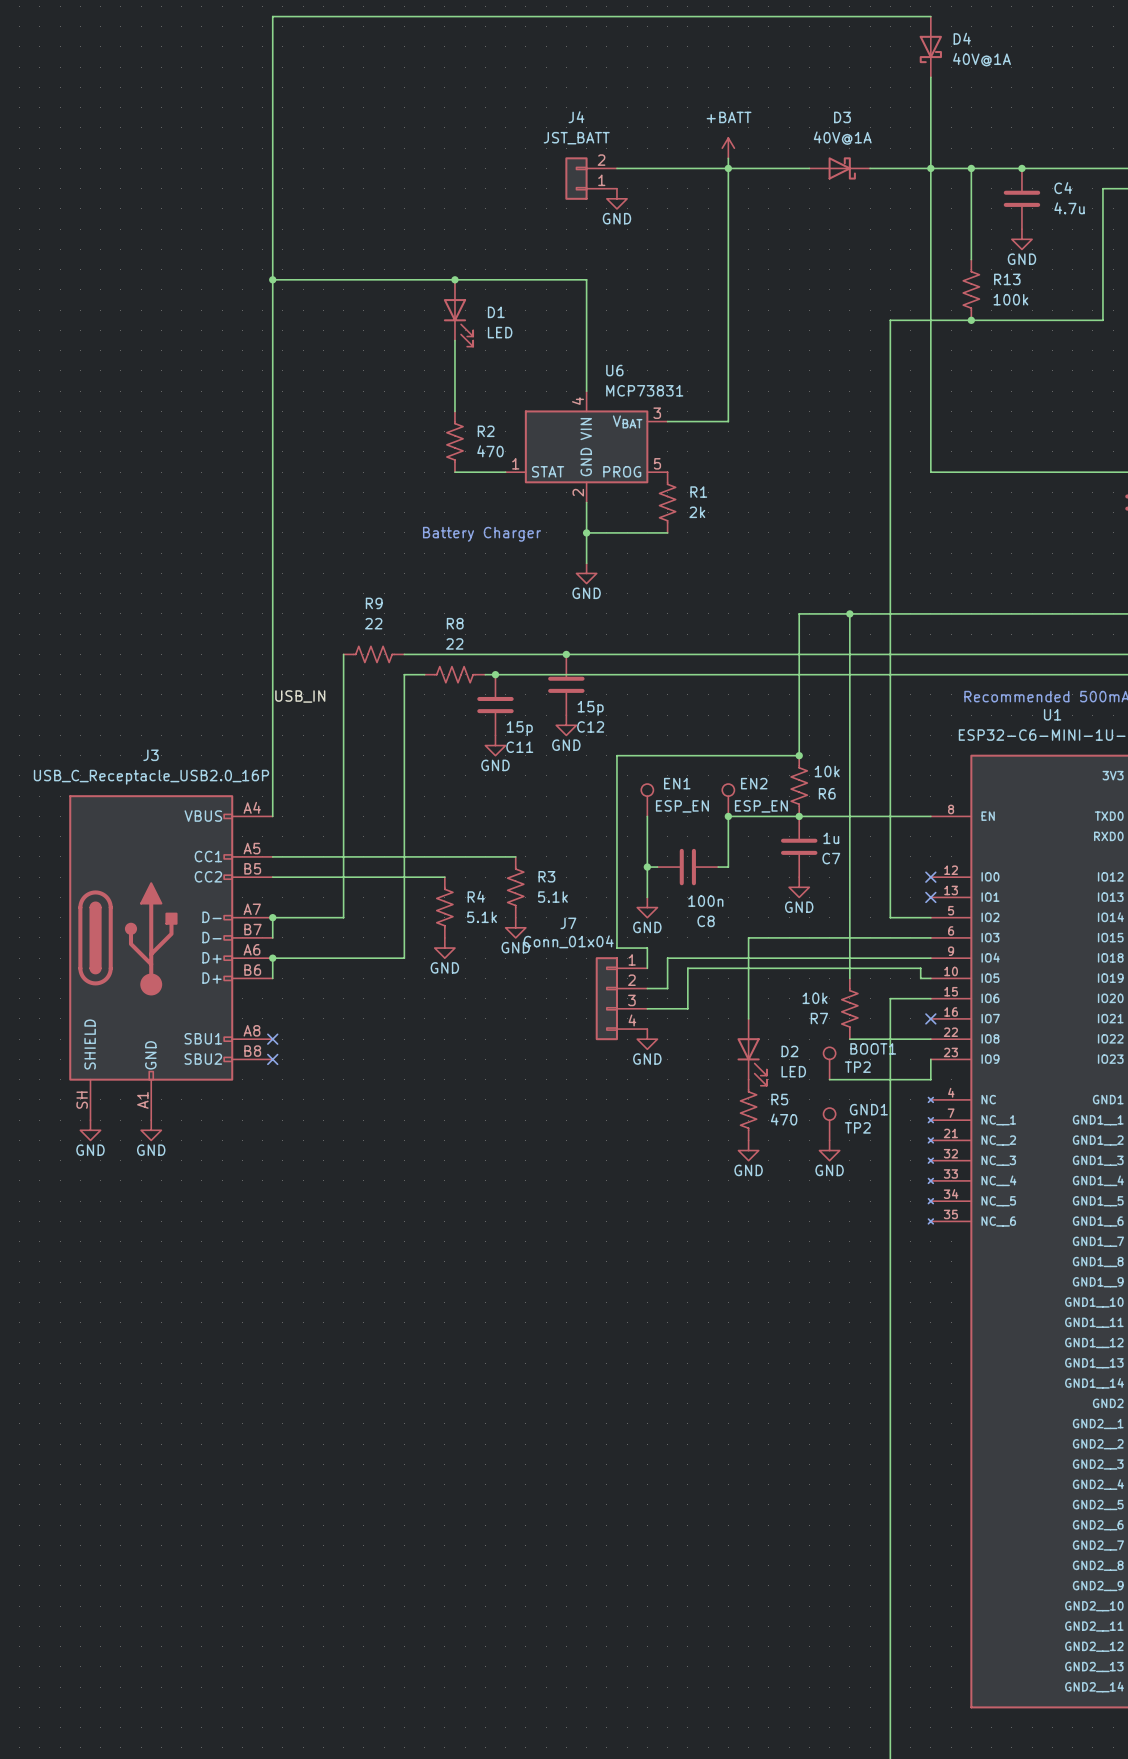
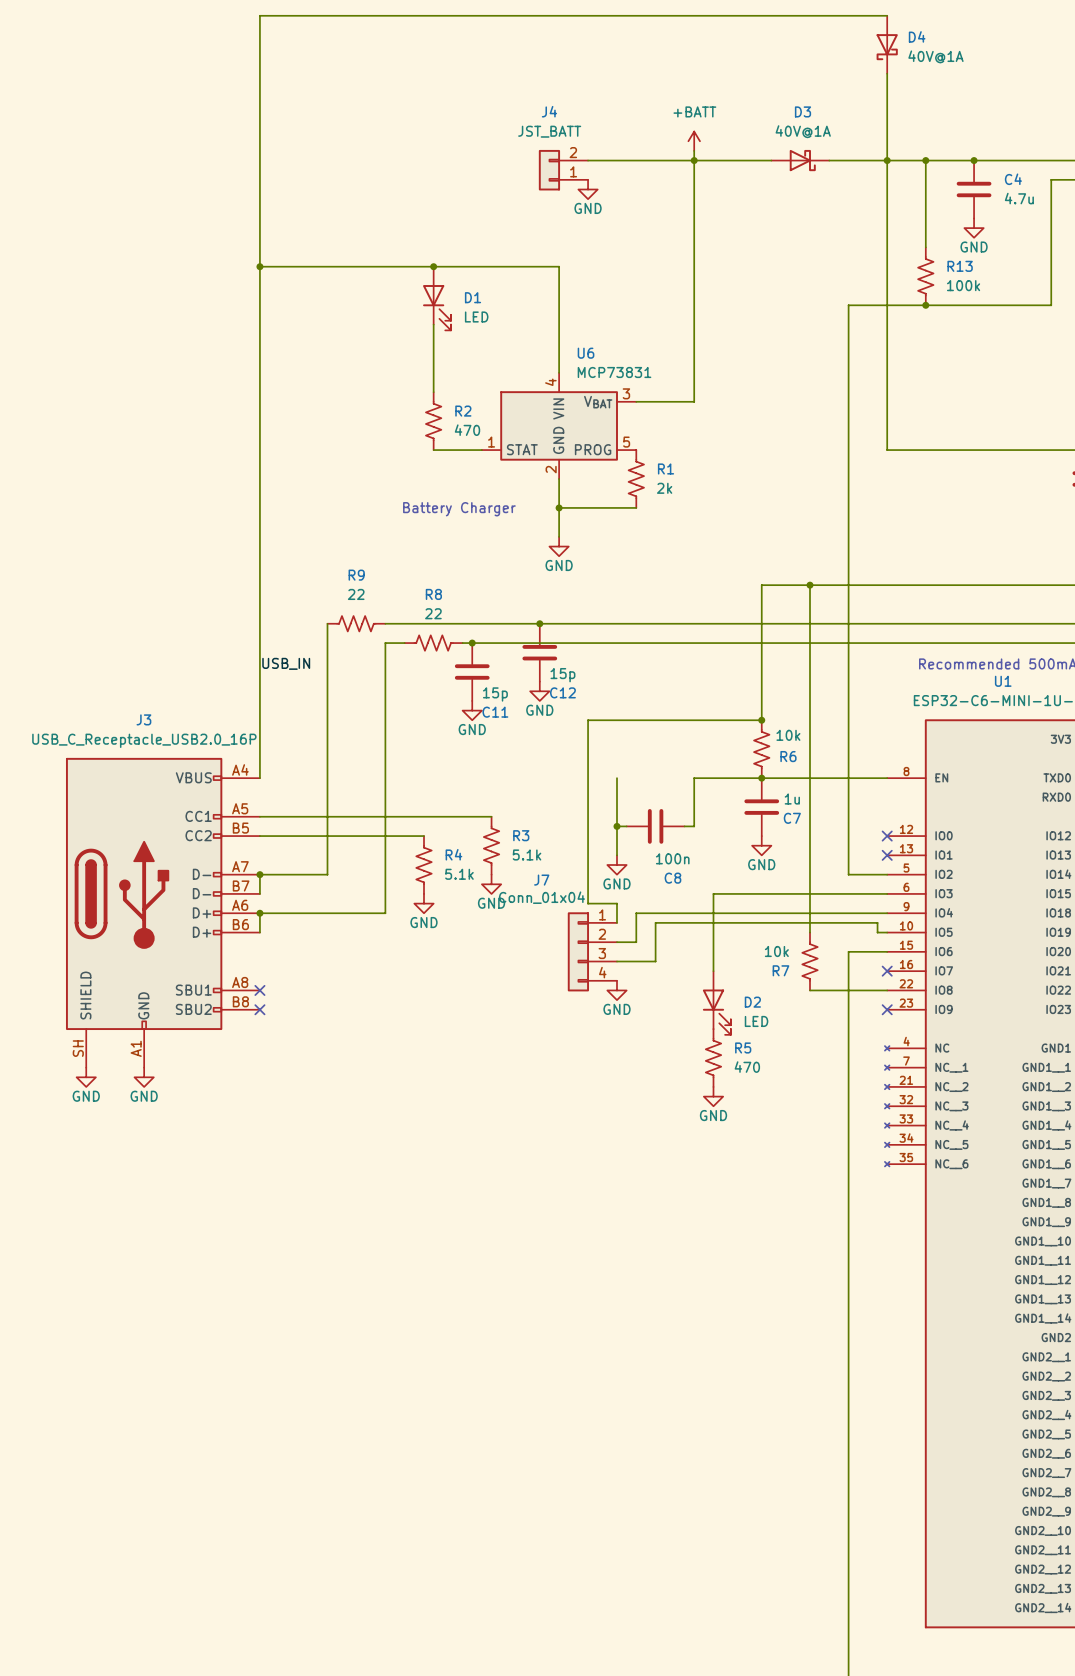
EN1: ESP_EN (647, 800) -> none
EN2: ESP_EN (728, 800) -> none
junction: (728, 816) -> none
wire: (930, 1059) (930, 1079) (829, 1079) -> none
no-connect mark: none -> (887, 1009)
BOOT1: TP2 (829, 1063) -> none
GND1: TP2 (829, 1124) -> none
power symbol: GND (829, 1150) -> none

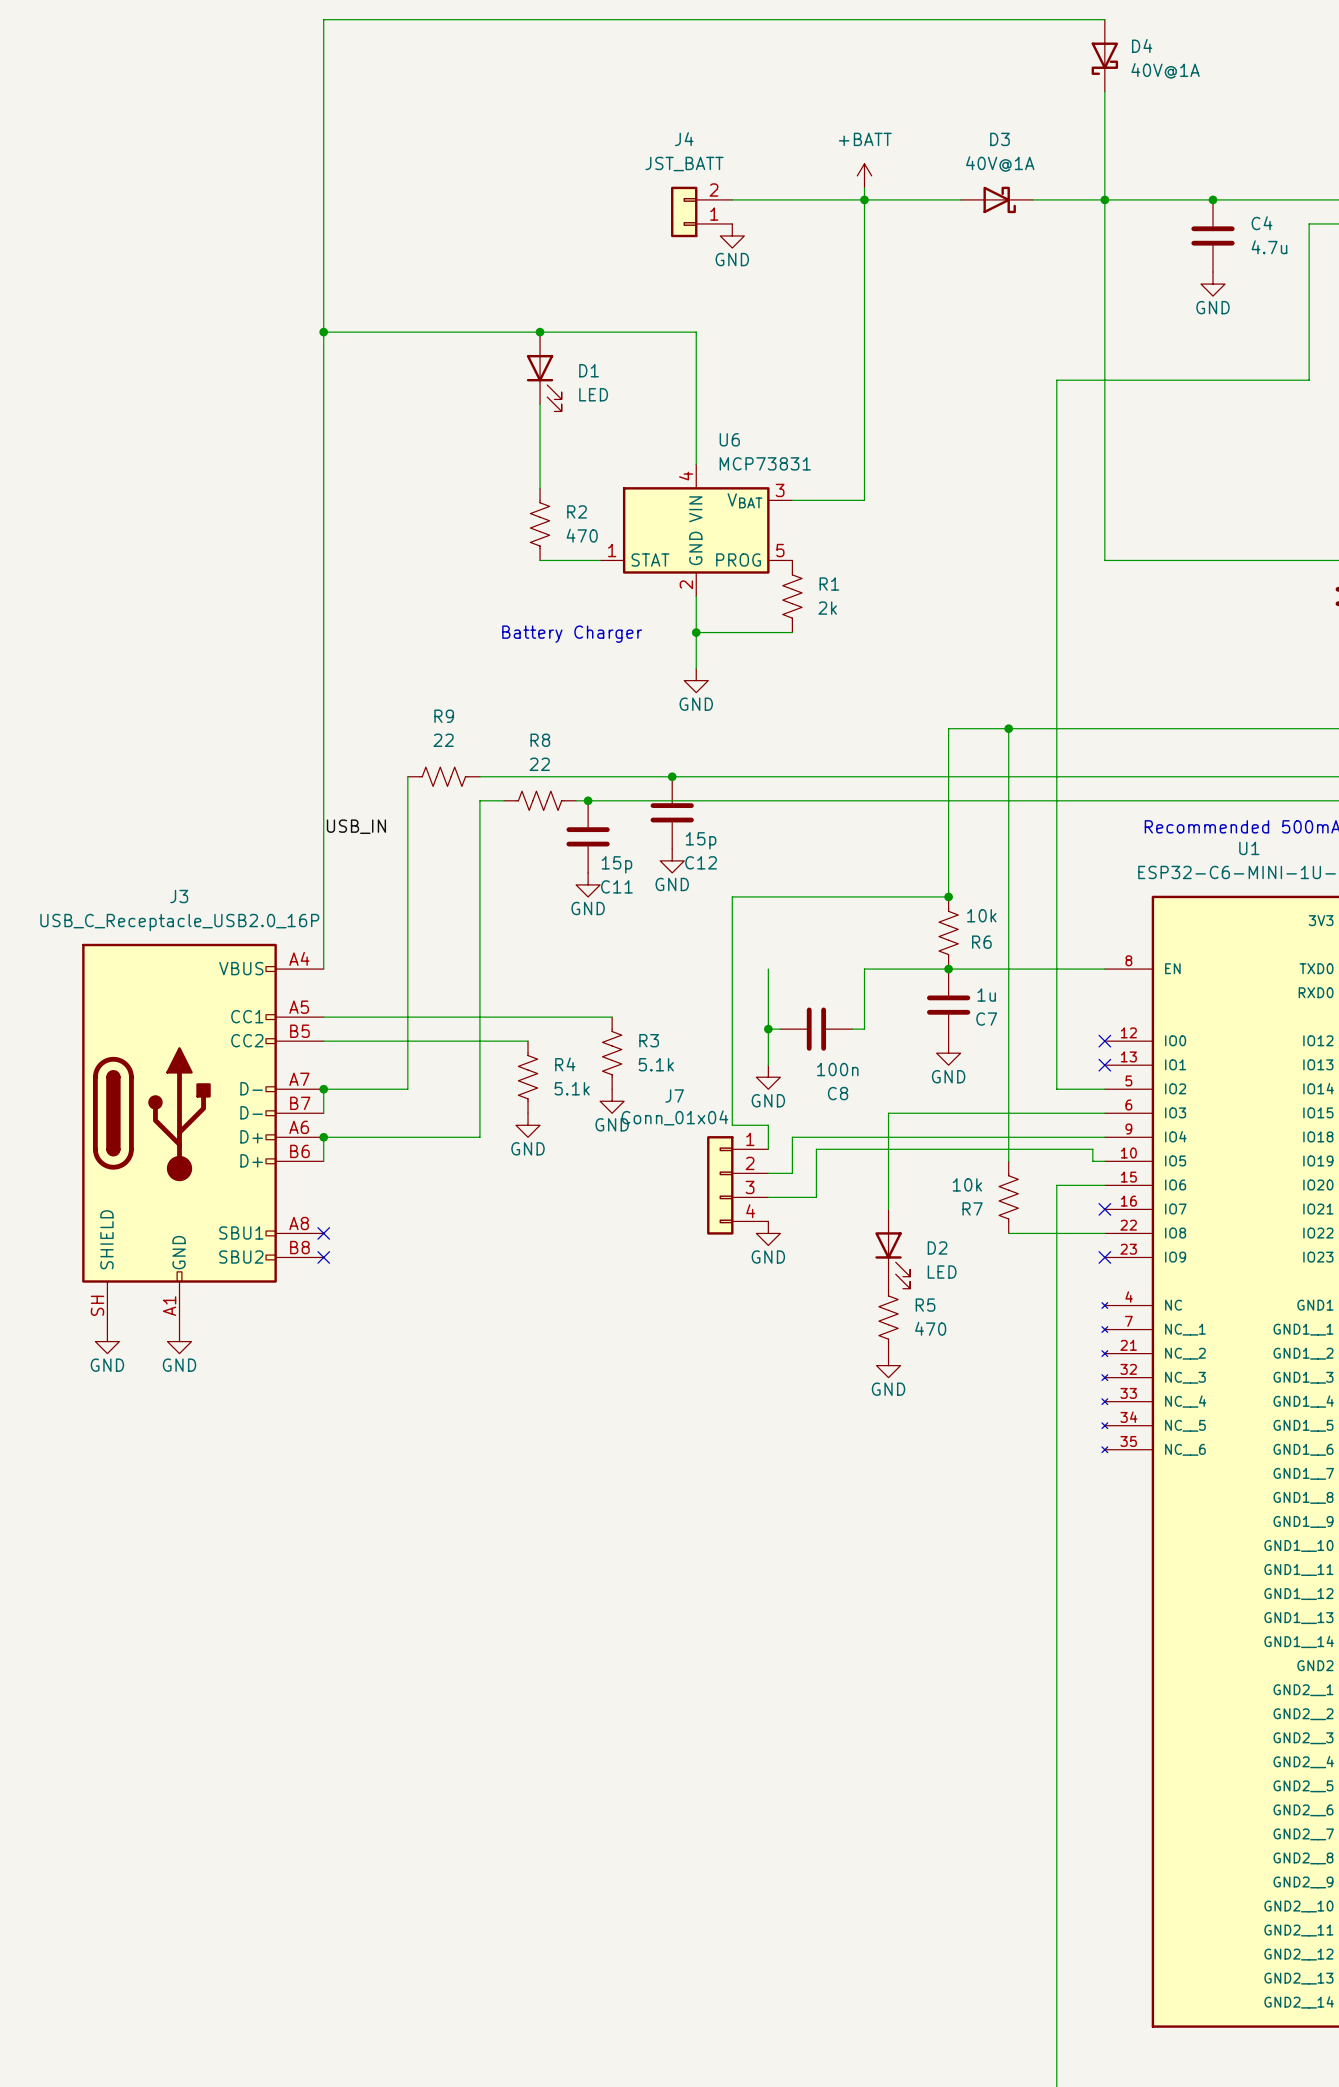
wire: (925, 160) (925, 247) -> none
junction: (925, 160) -> none
R13: 100k (925, 276) -> none
junction: (925, 305) -> none

